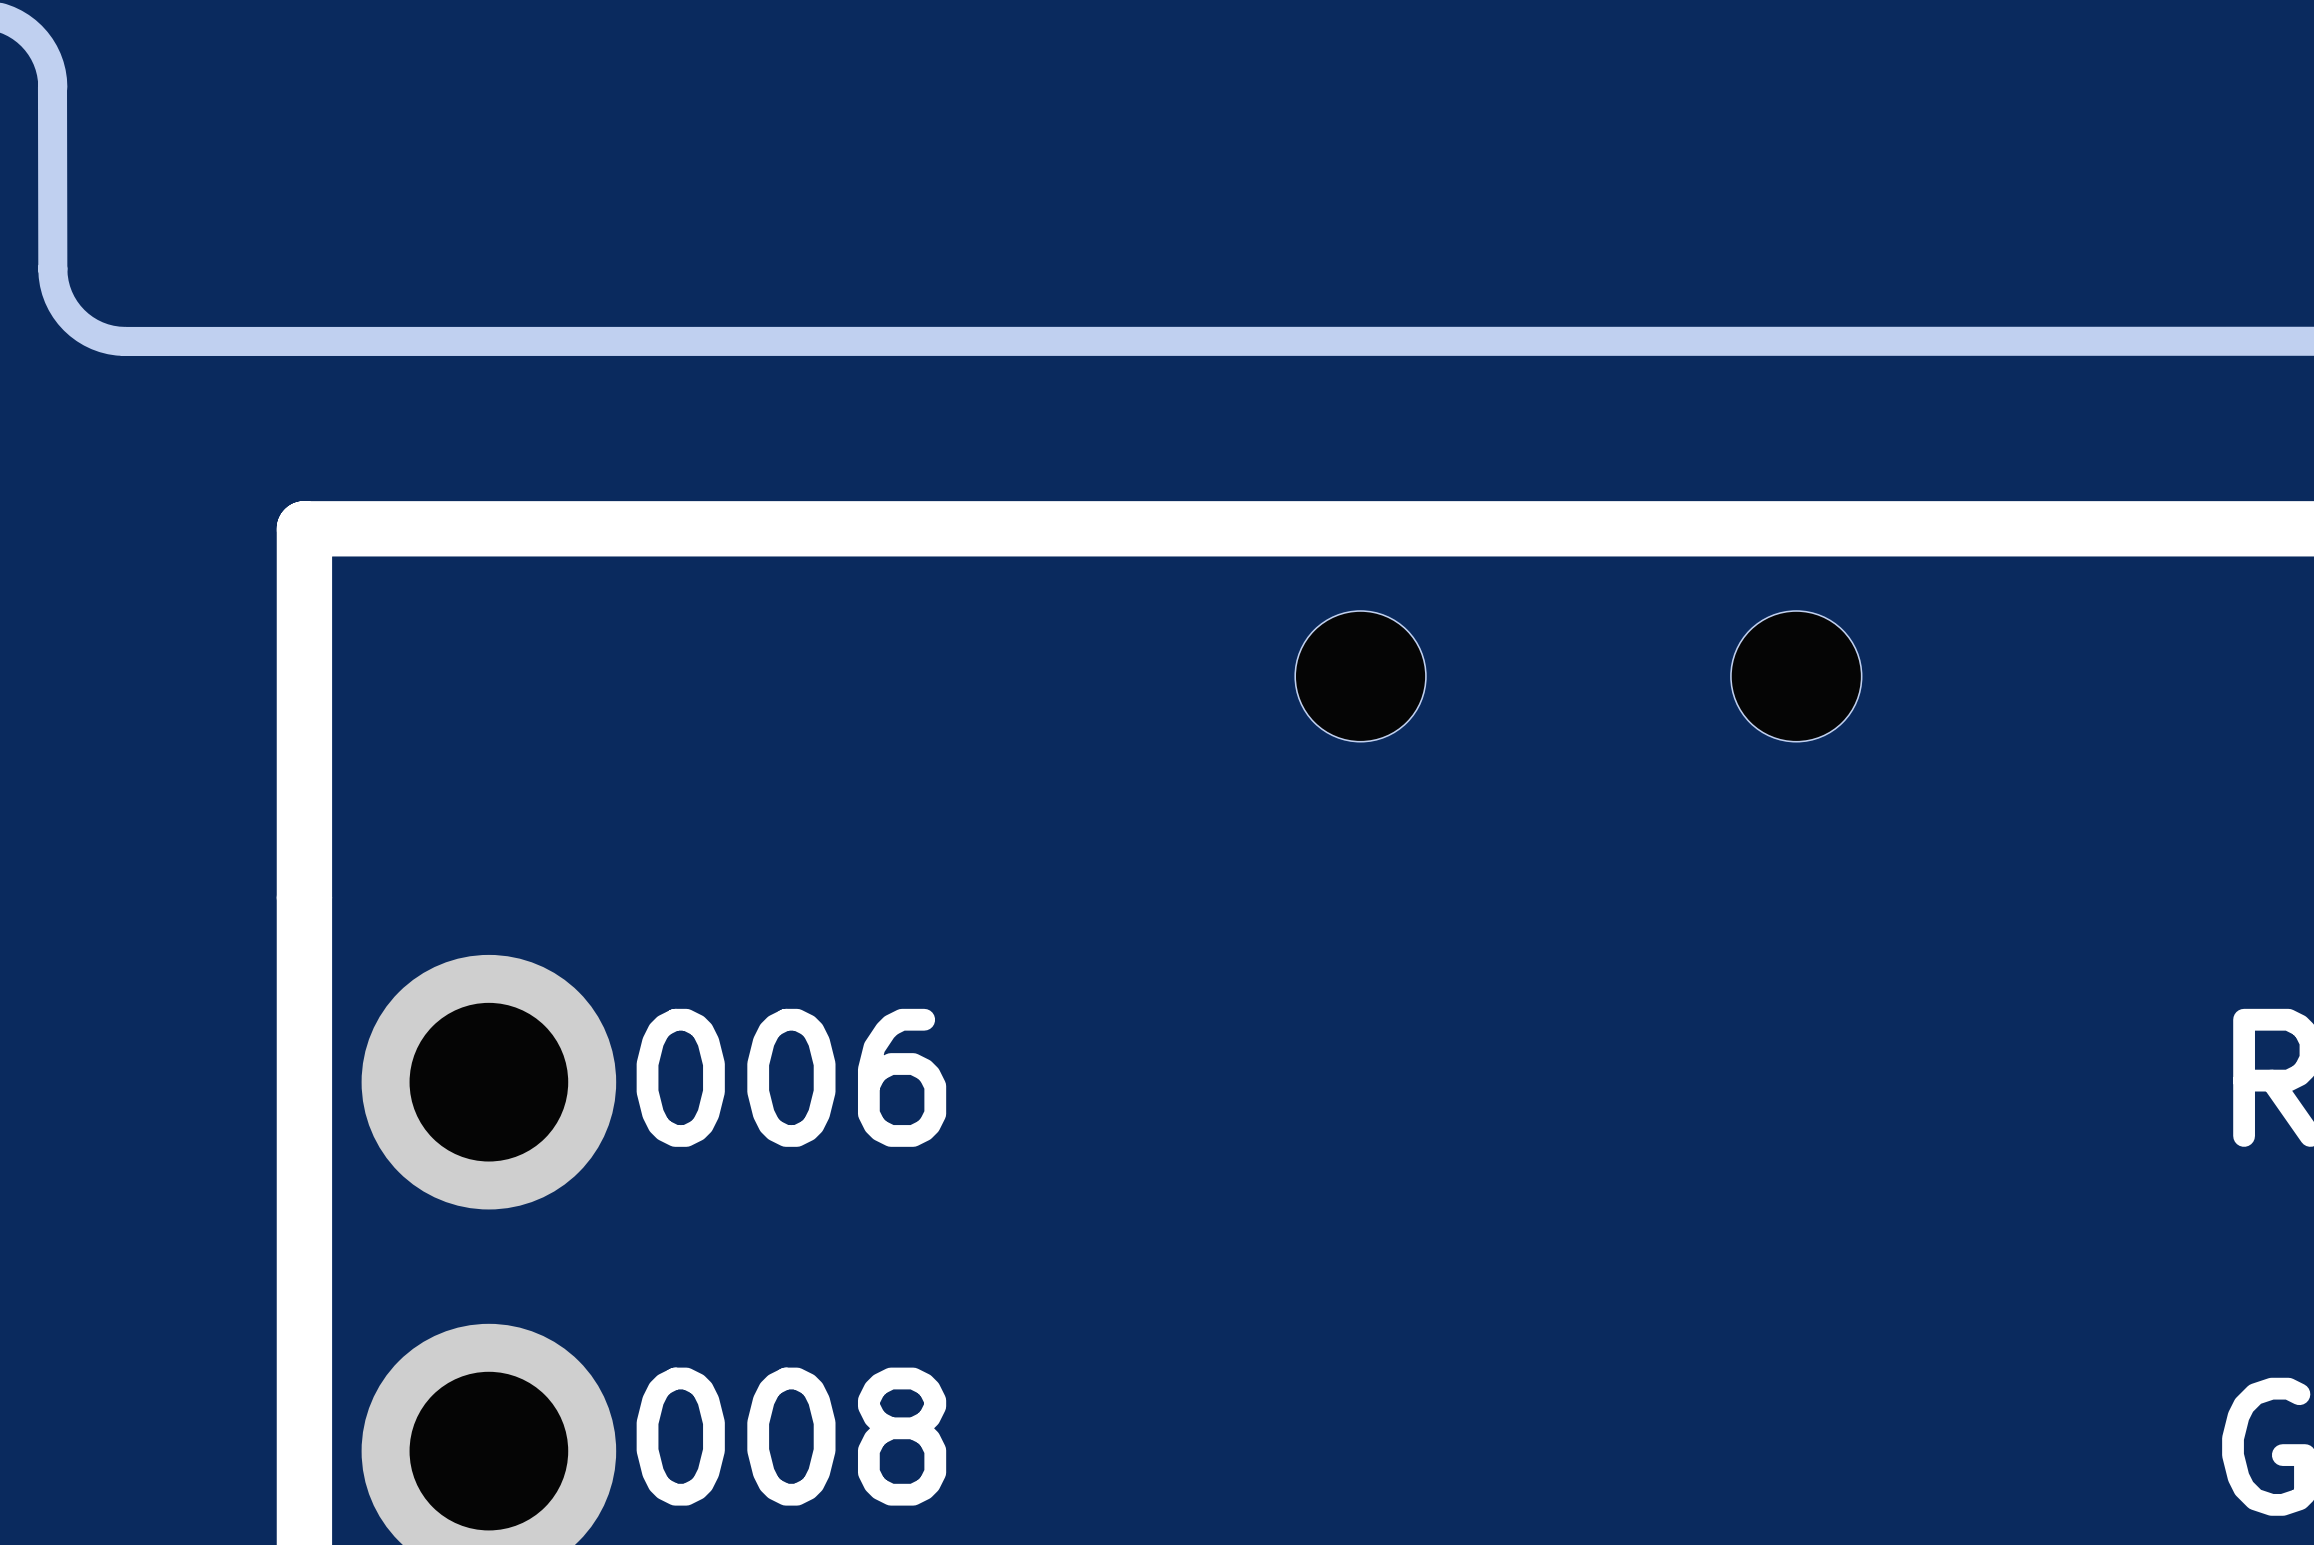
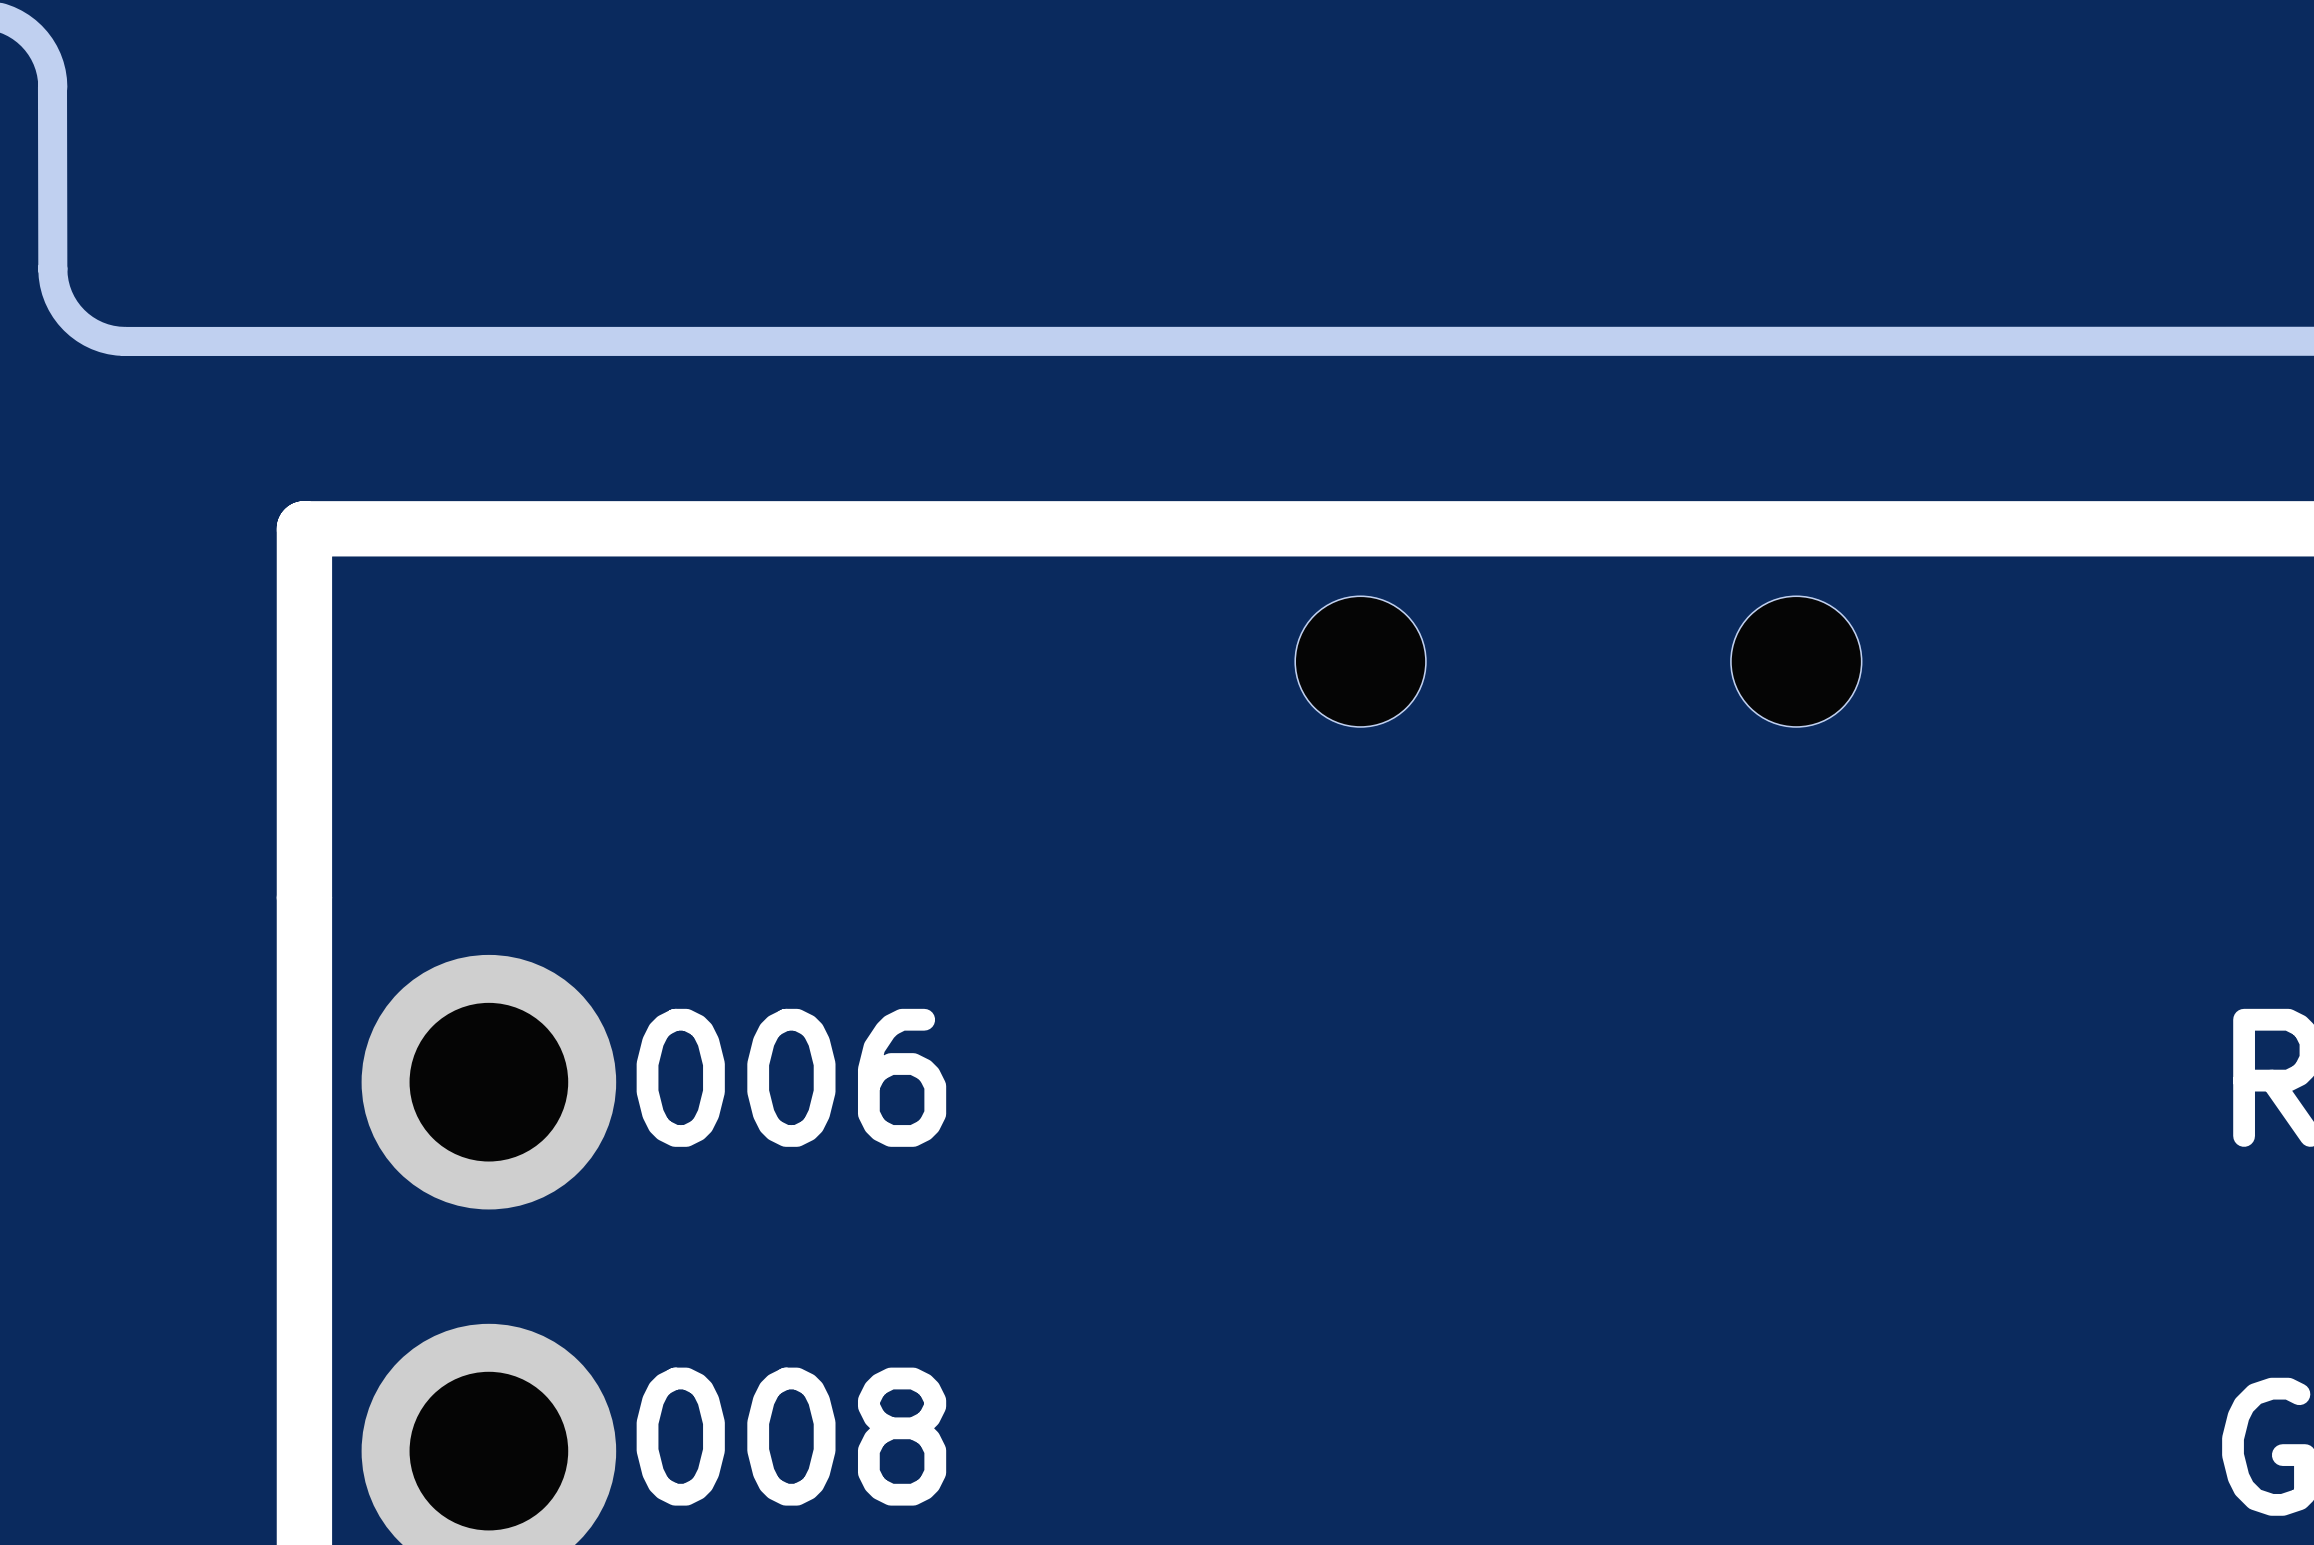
part position: (1578, 676) -> (1578, 661)

